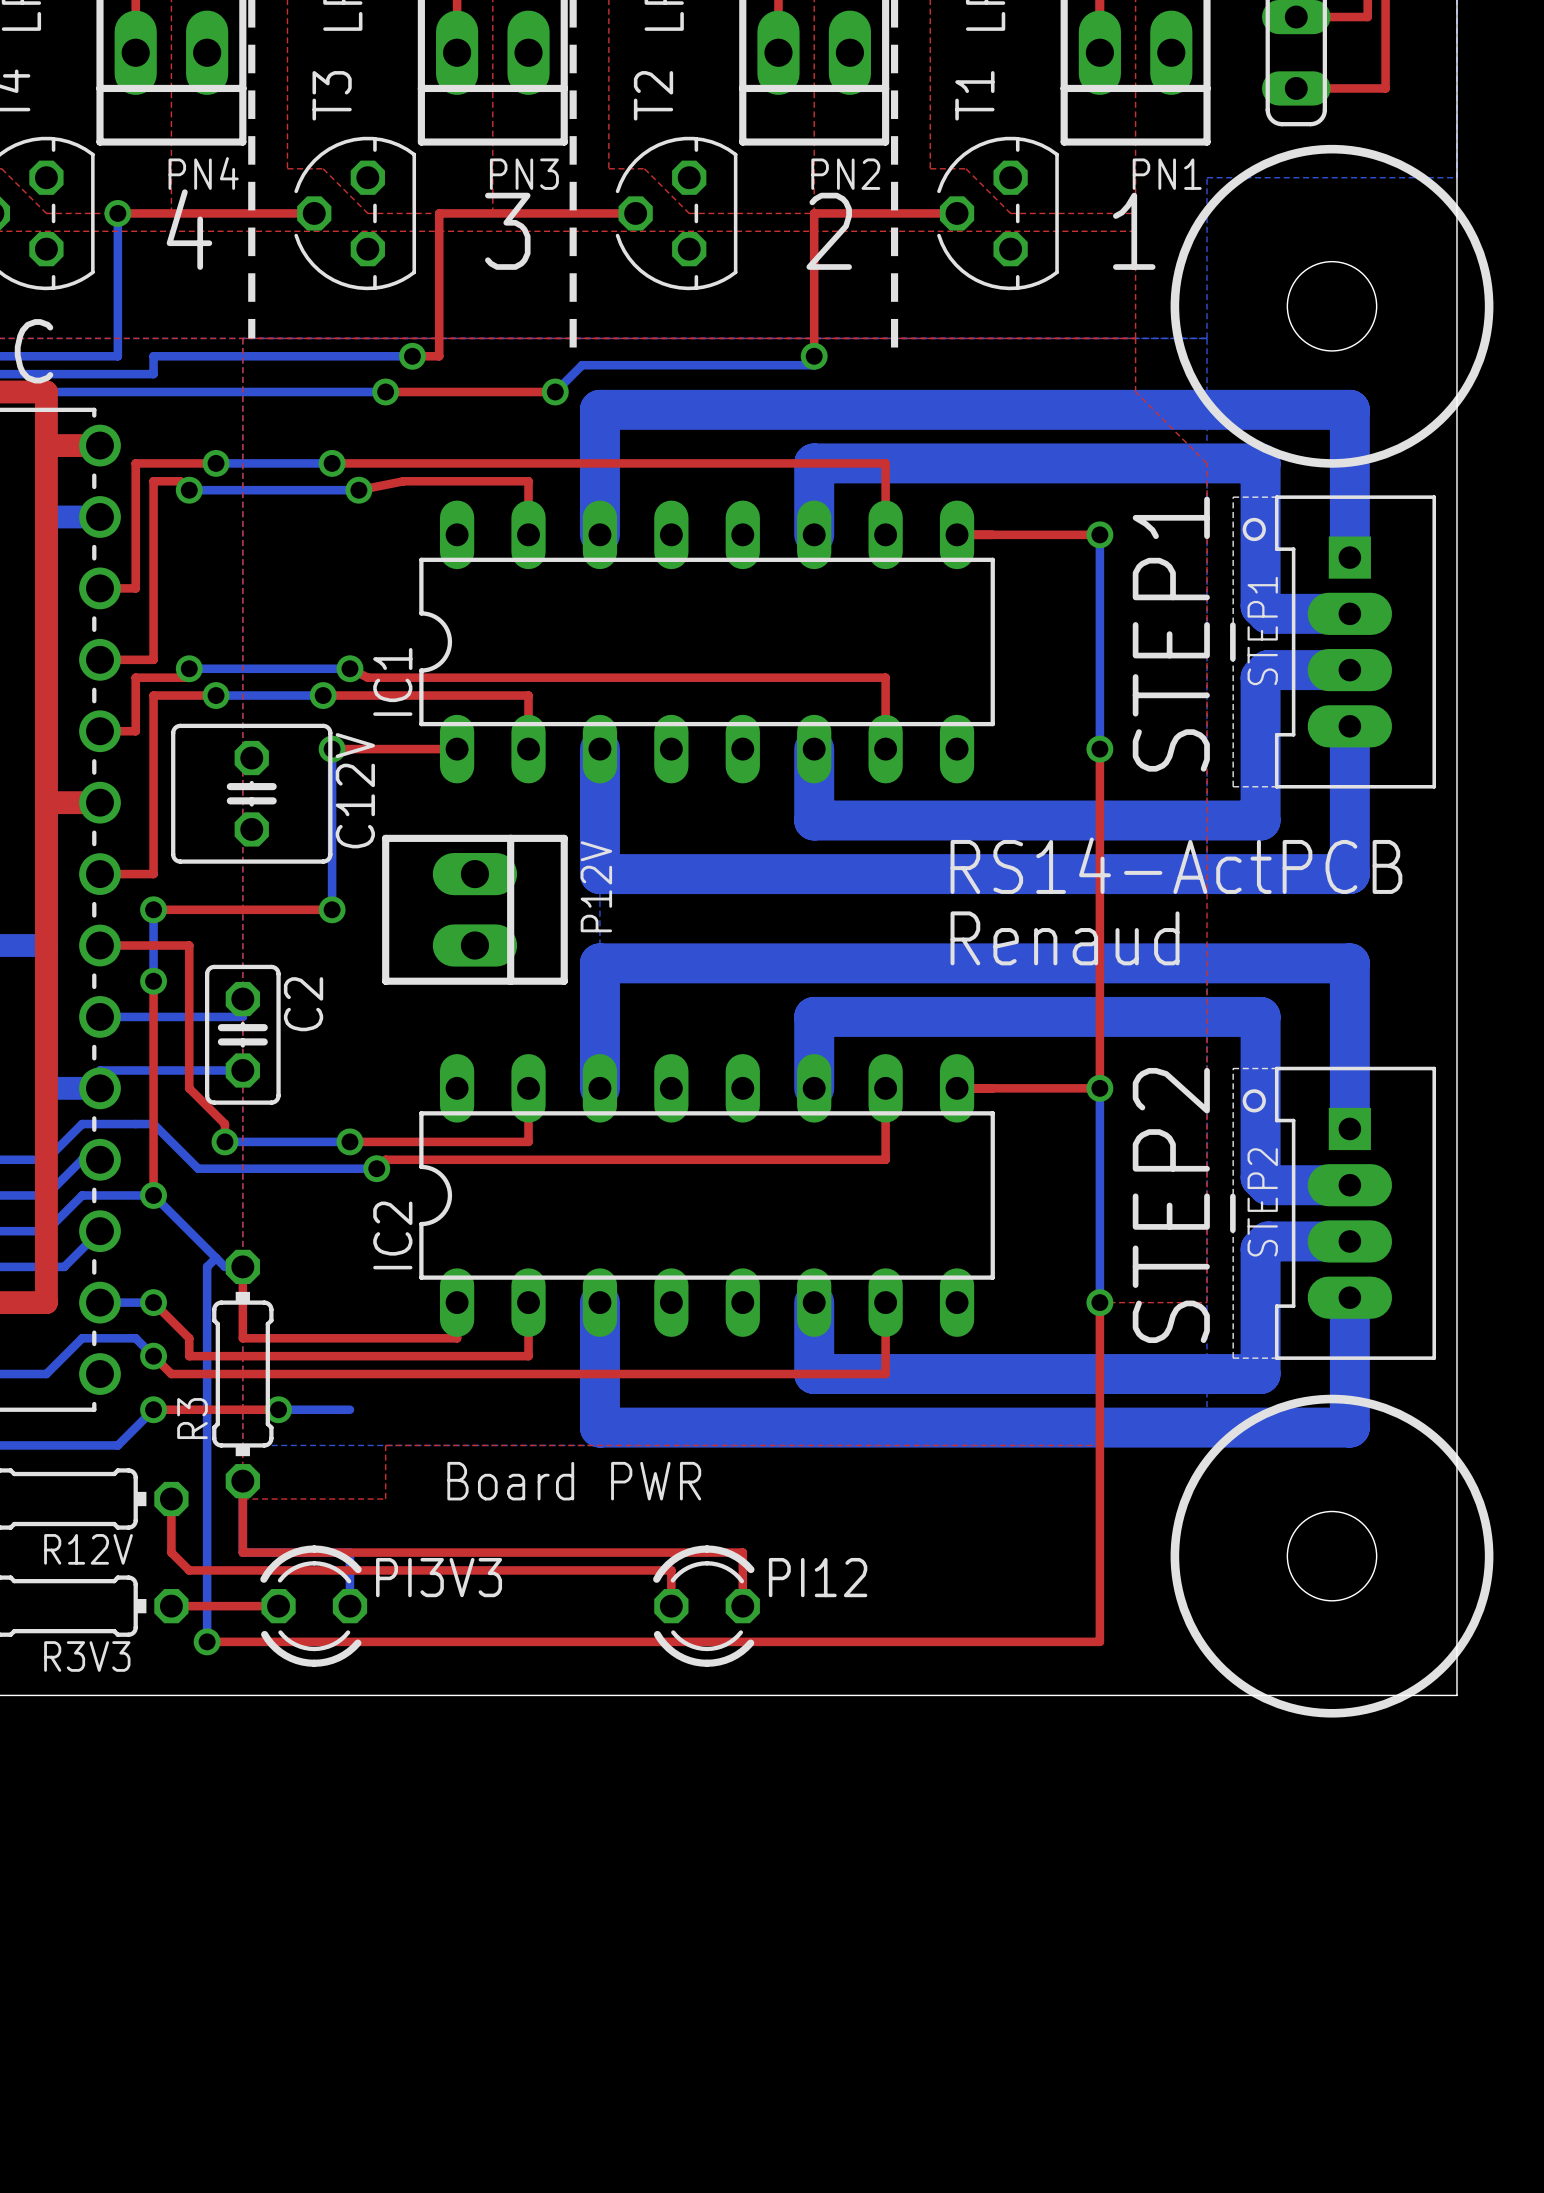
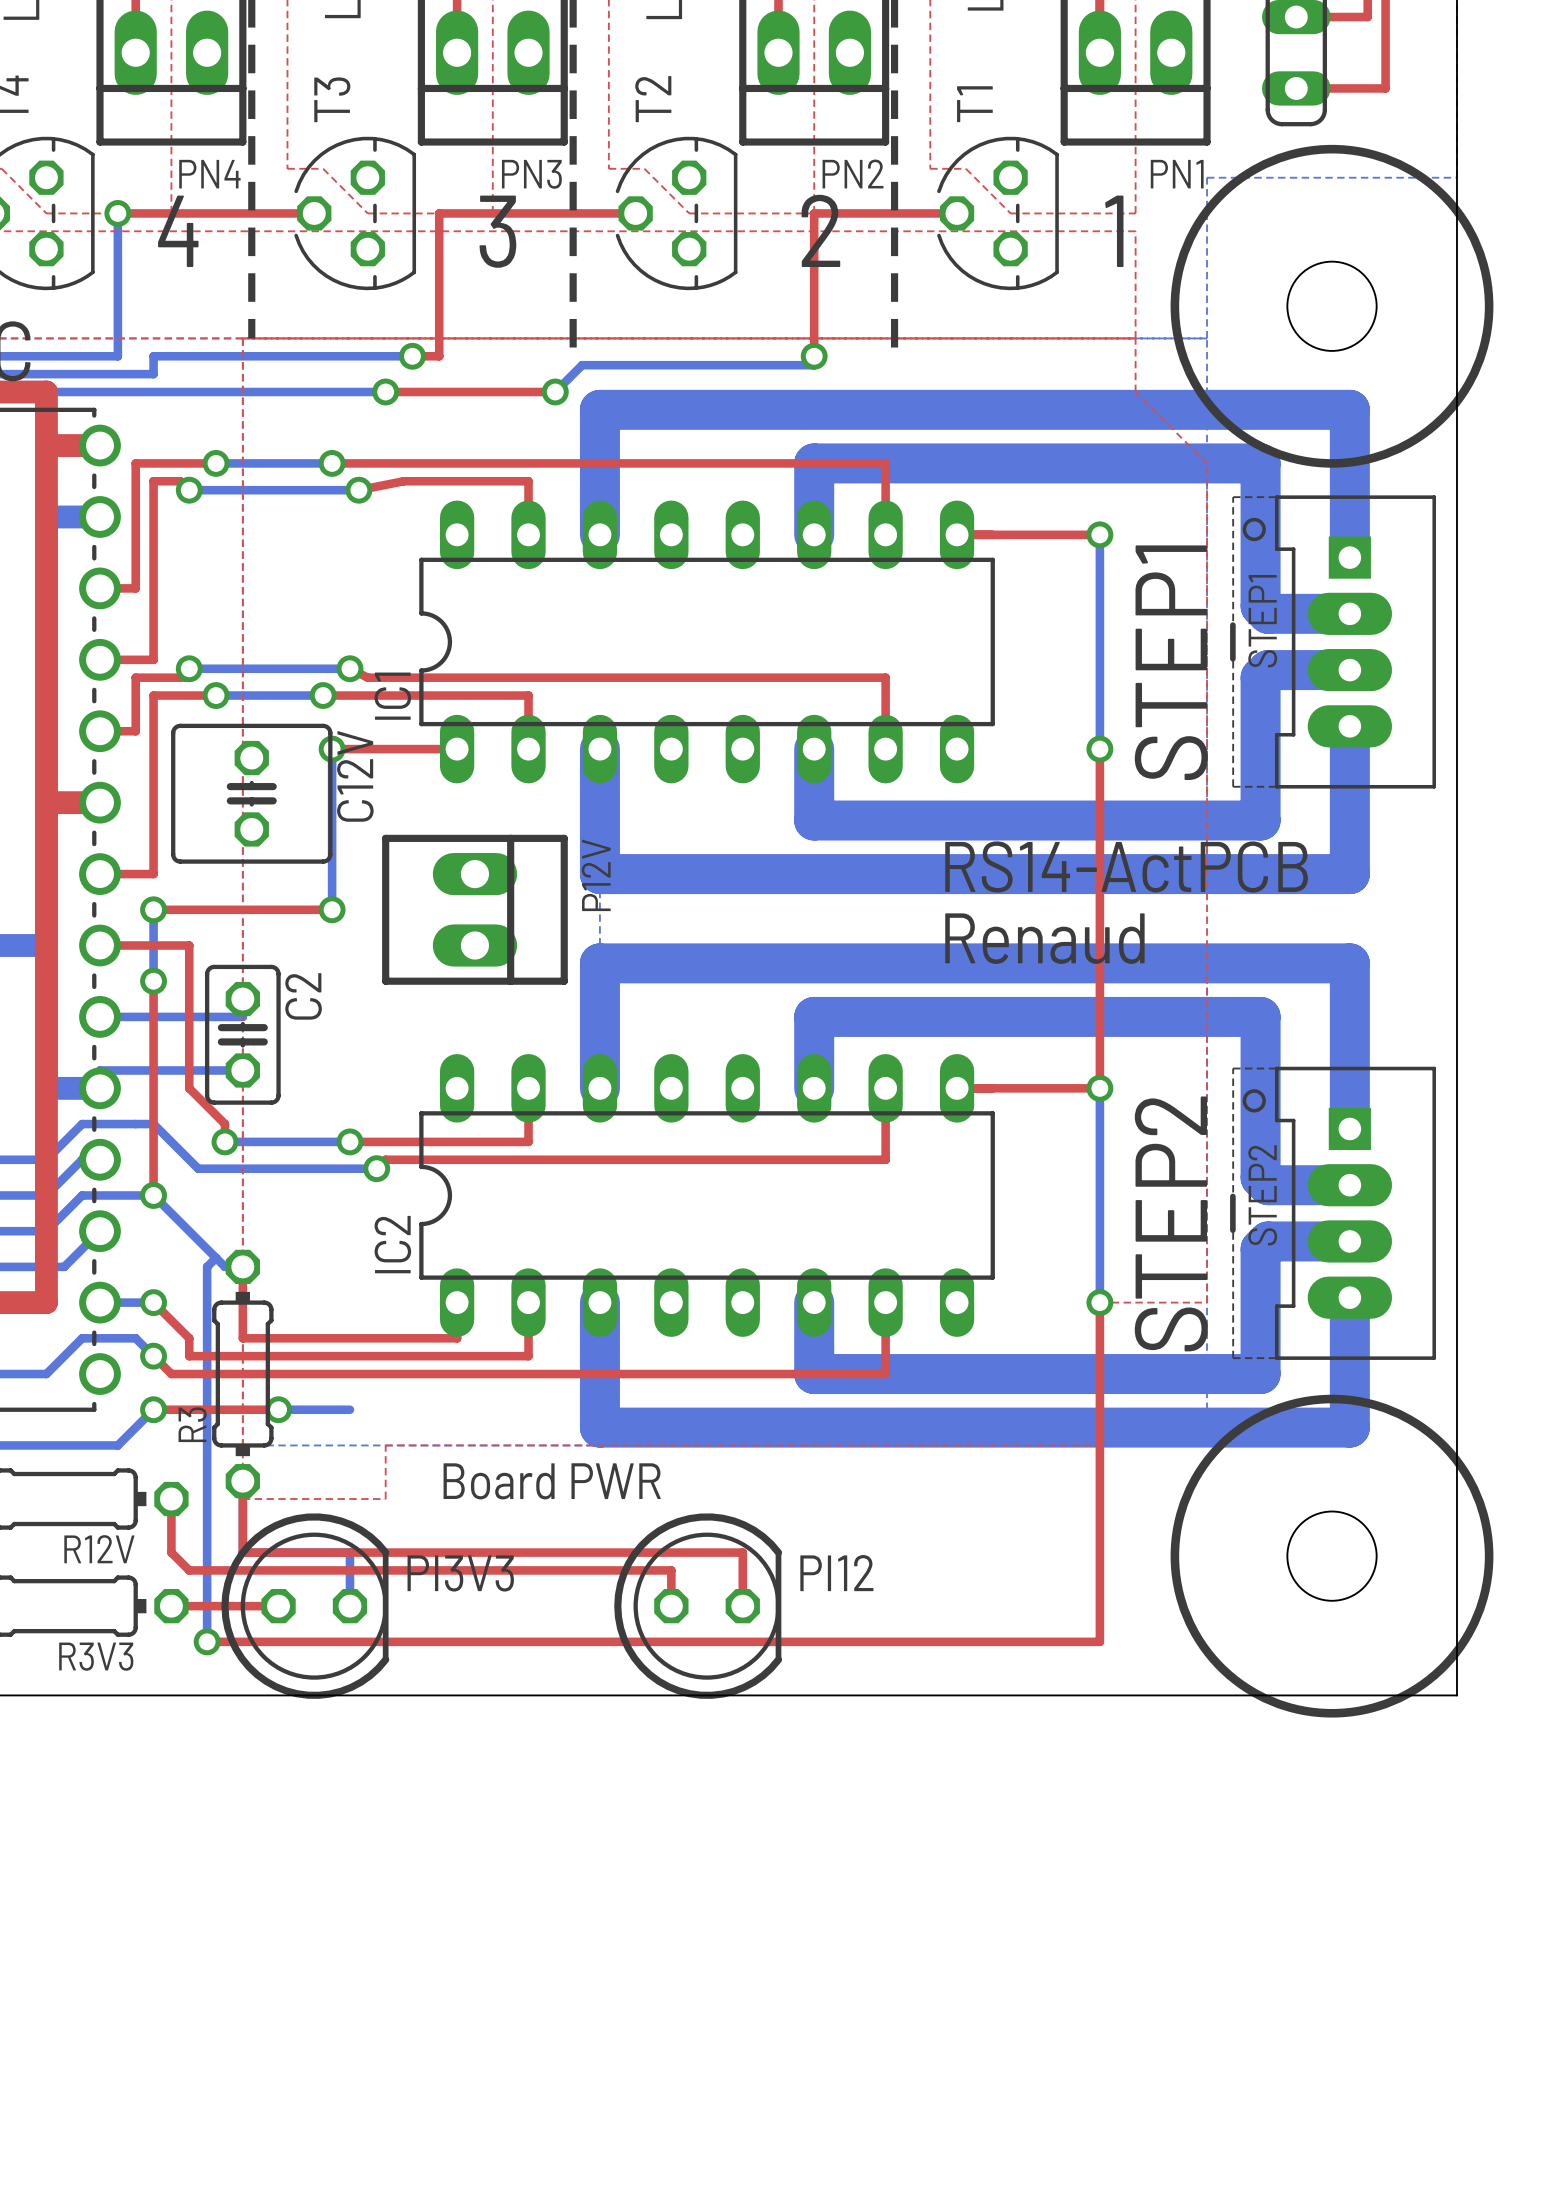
PI3V3 footprint: [260, 1545, 368, 1667] -> [221, 1513, 390, 1699]
PI12 footprint: [653, 1545, 760, 1667] -> [614, 1513, 783, 1699]

